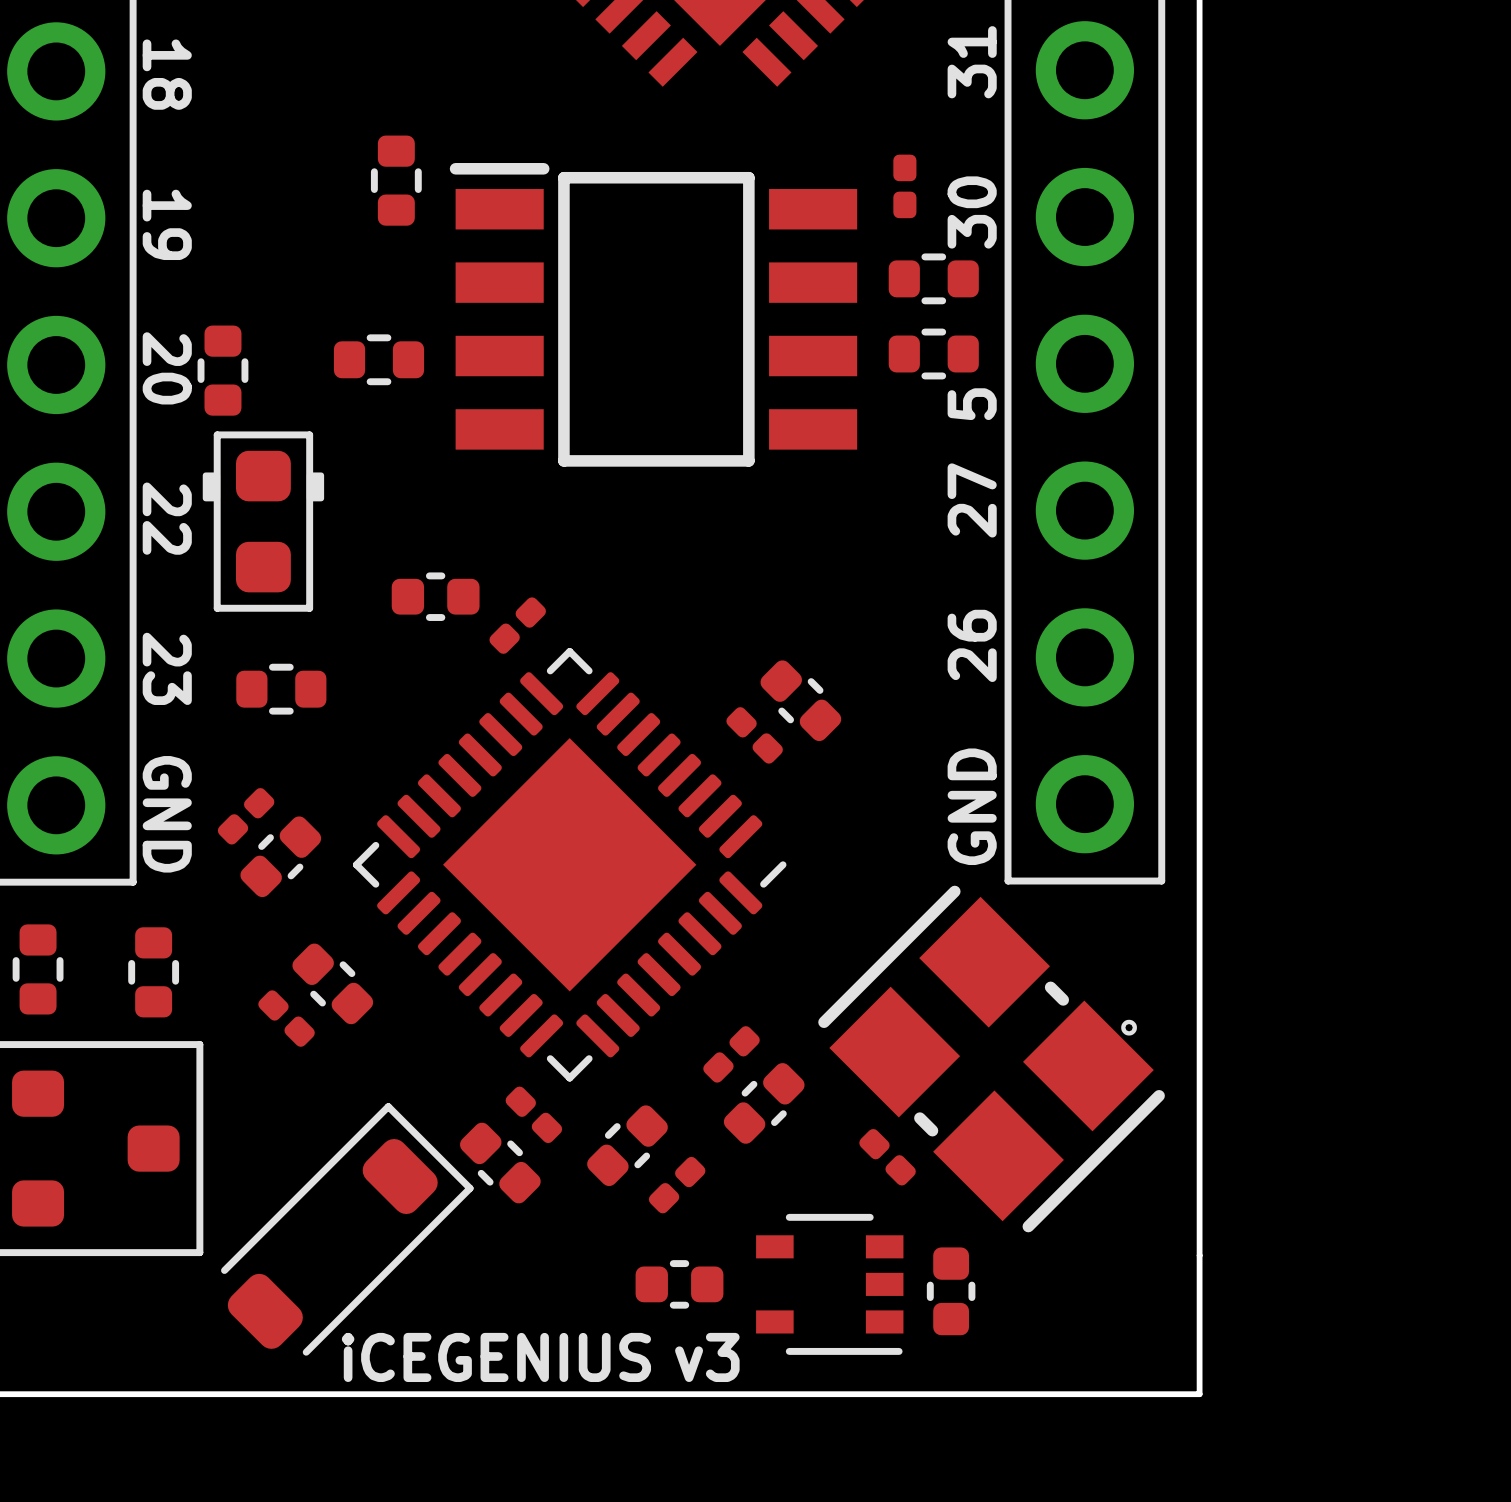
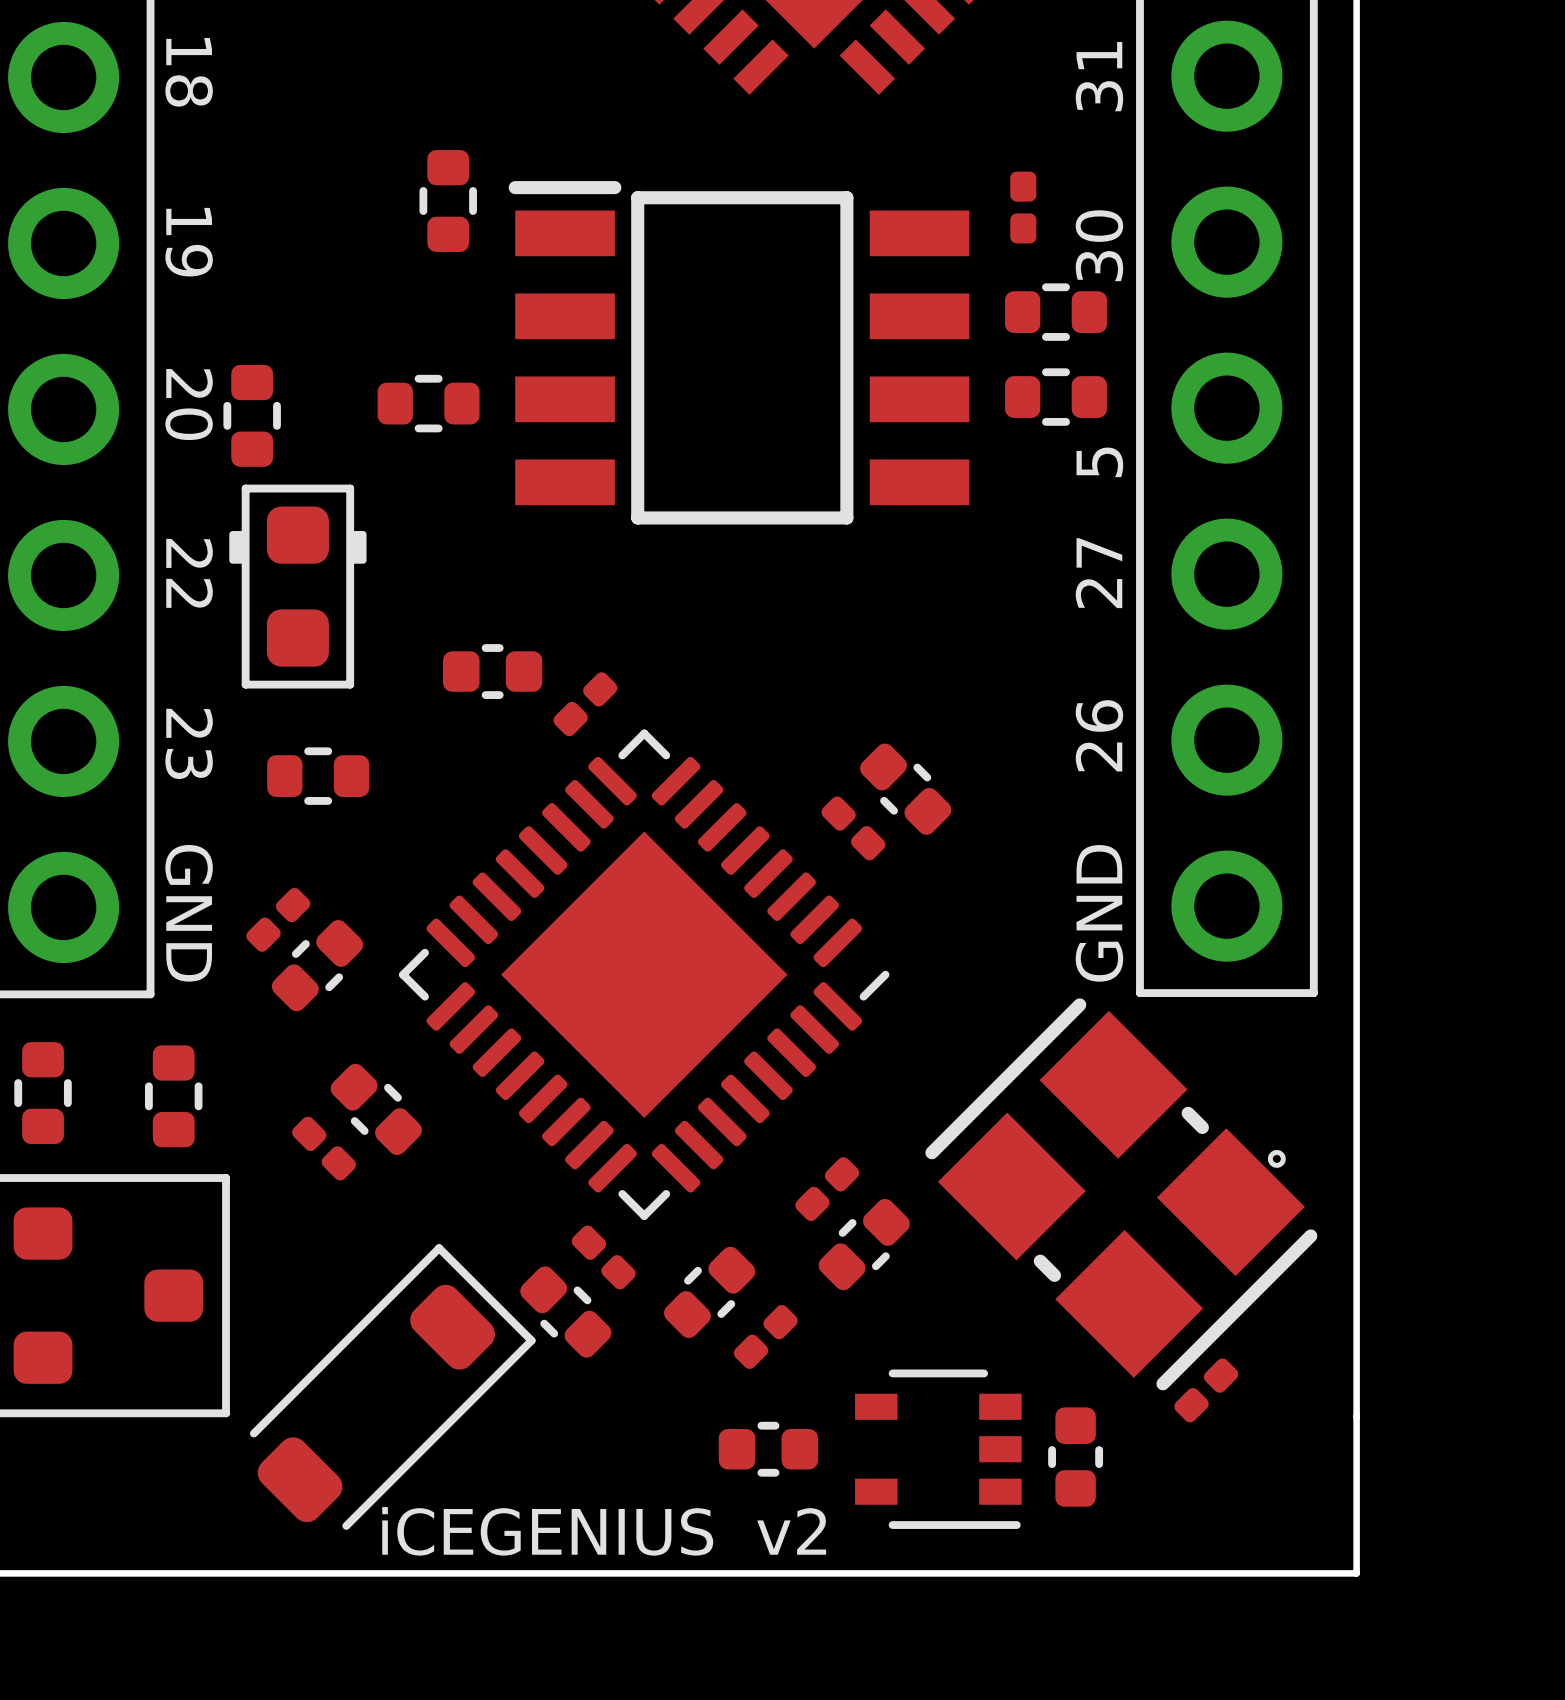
part rotation: 0° (887, 1157) -> 90° clockwise (1206, 1390)
part position: (887, 1157) -> (1206, 1390)
text: v3 (707, 1357) -> v2 (791, 1531)

